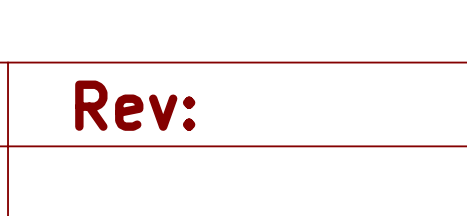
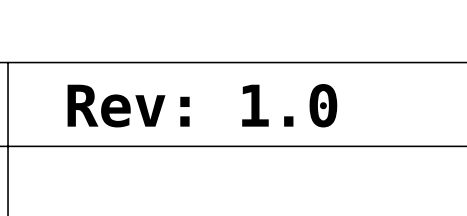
title block: Rev: (135, 105) -> Rev: 1.0 (202, 105)

